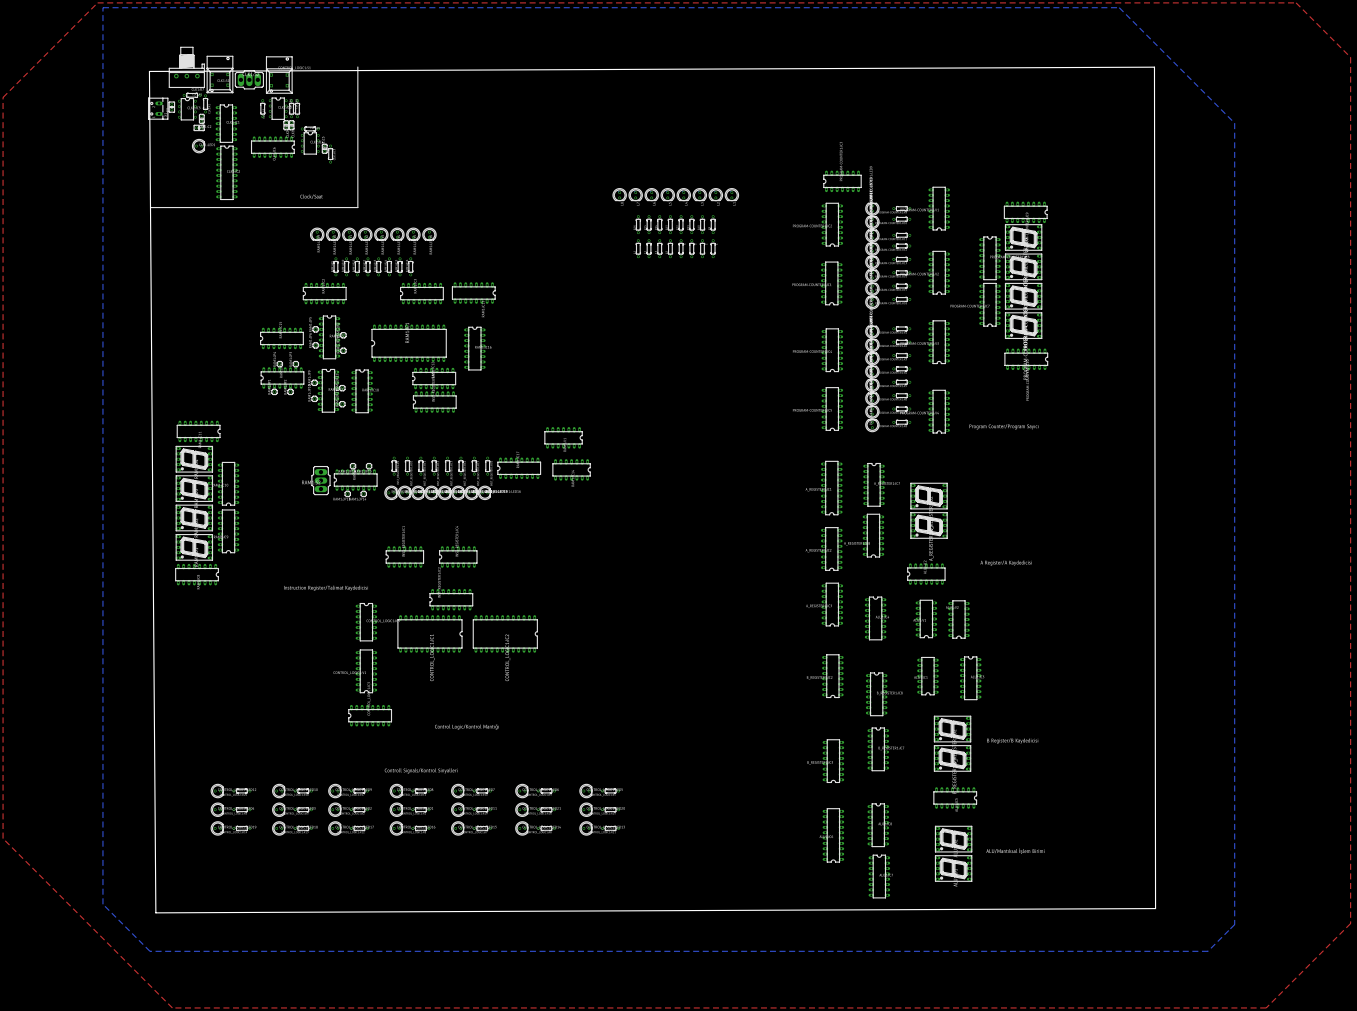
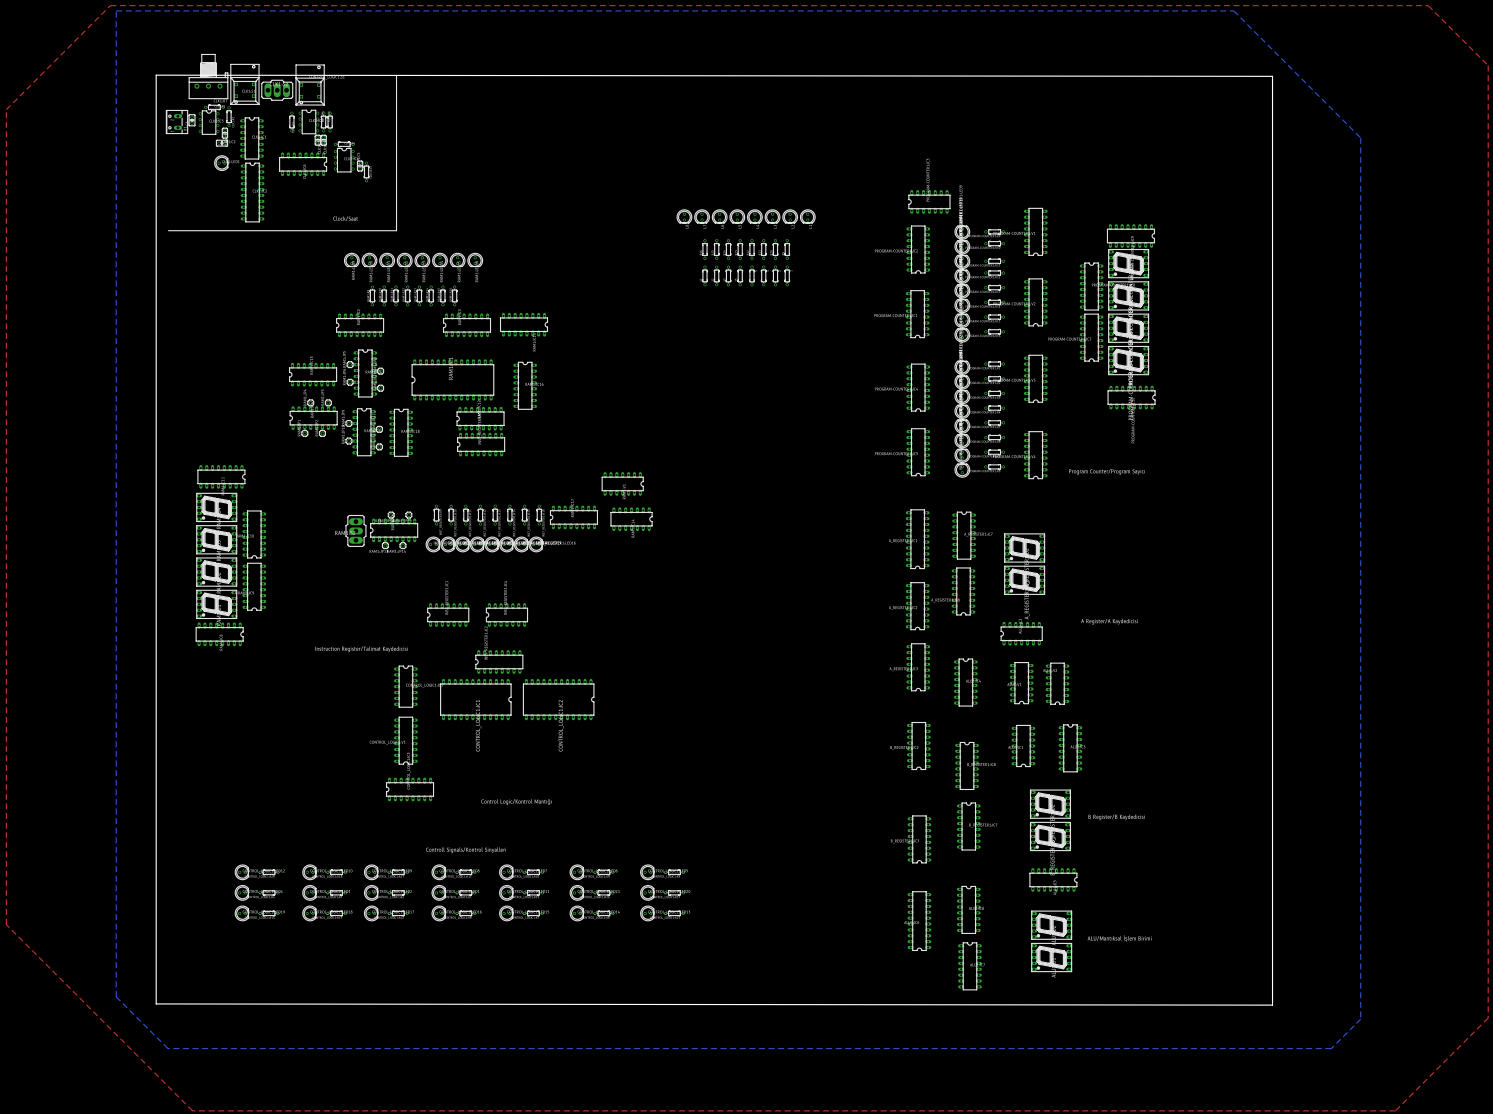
board edge: (1154, 67) (1155, 908) (155, 912) (149, 71) (1154, 67) -> (156, 75) (156, 1003) (1272, 1005) (1272, 76) (156, 75)

